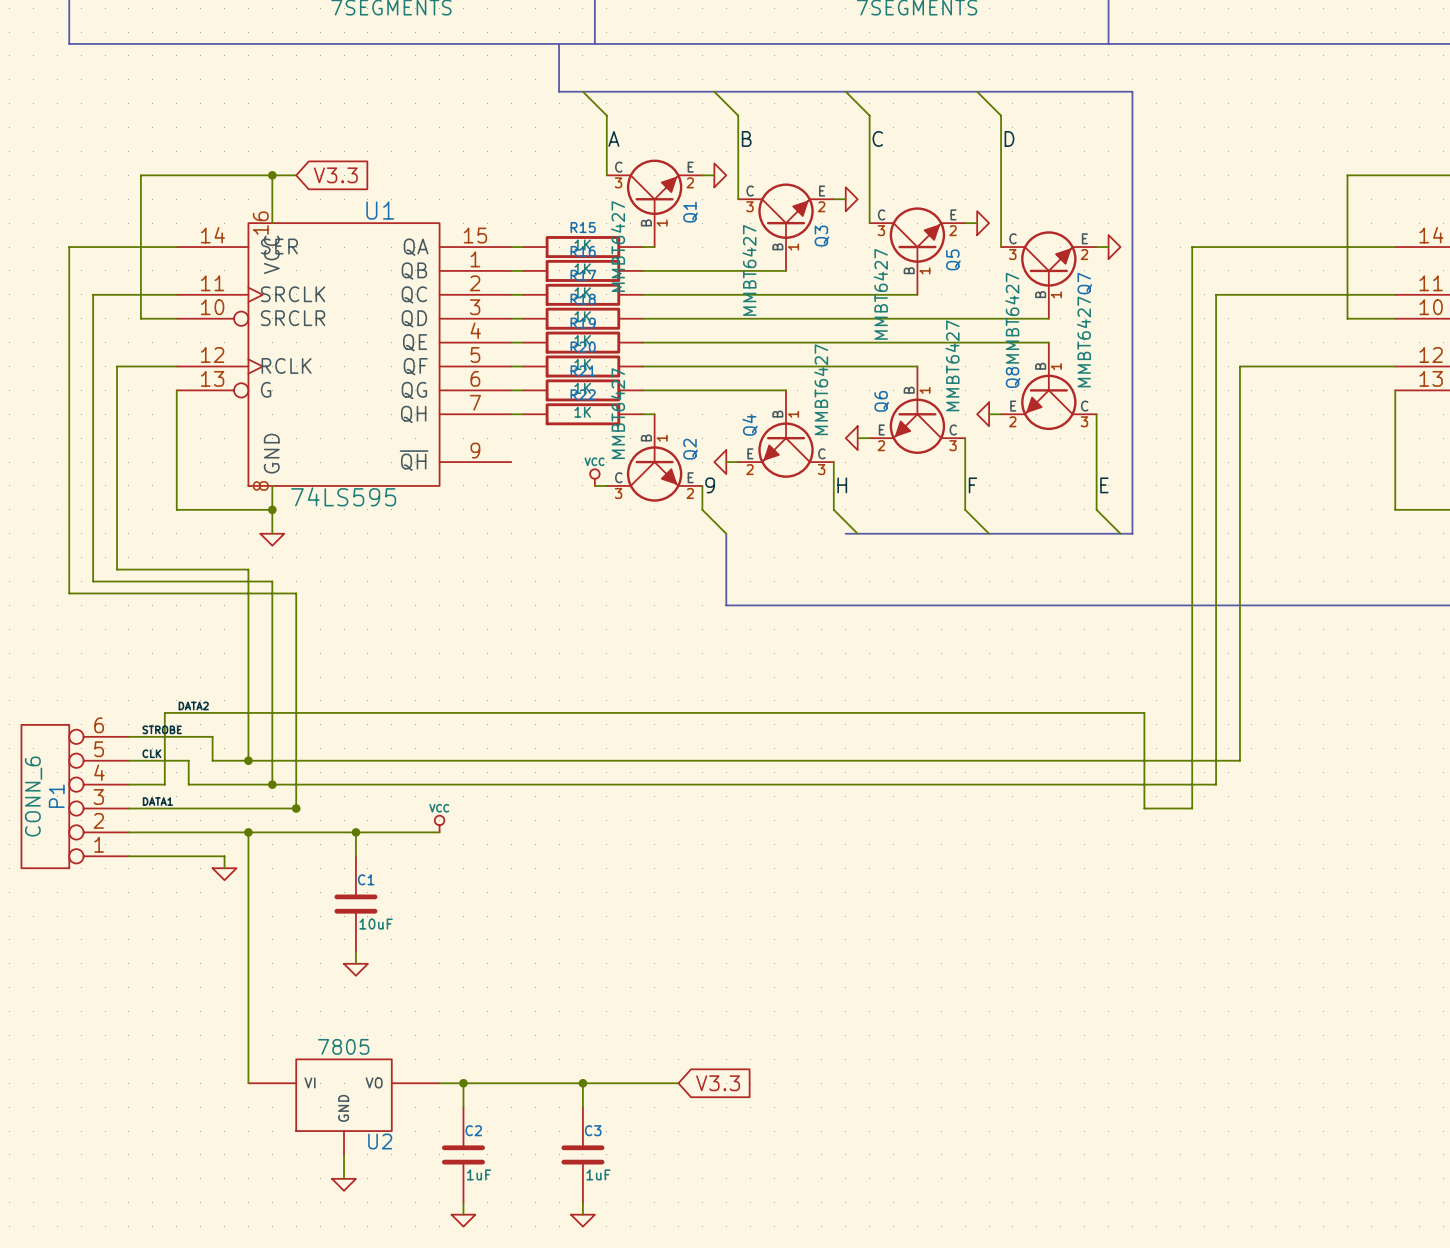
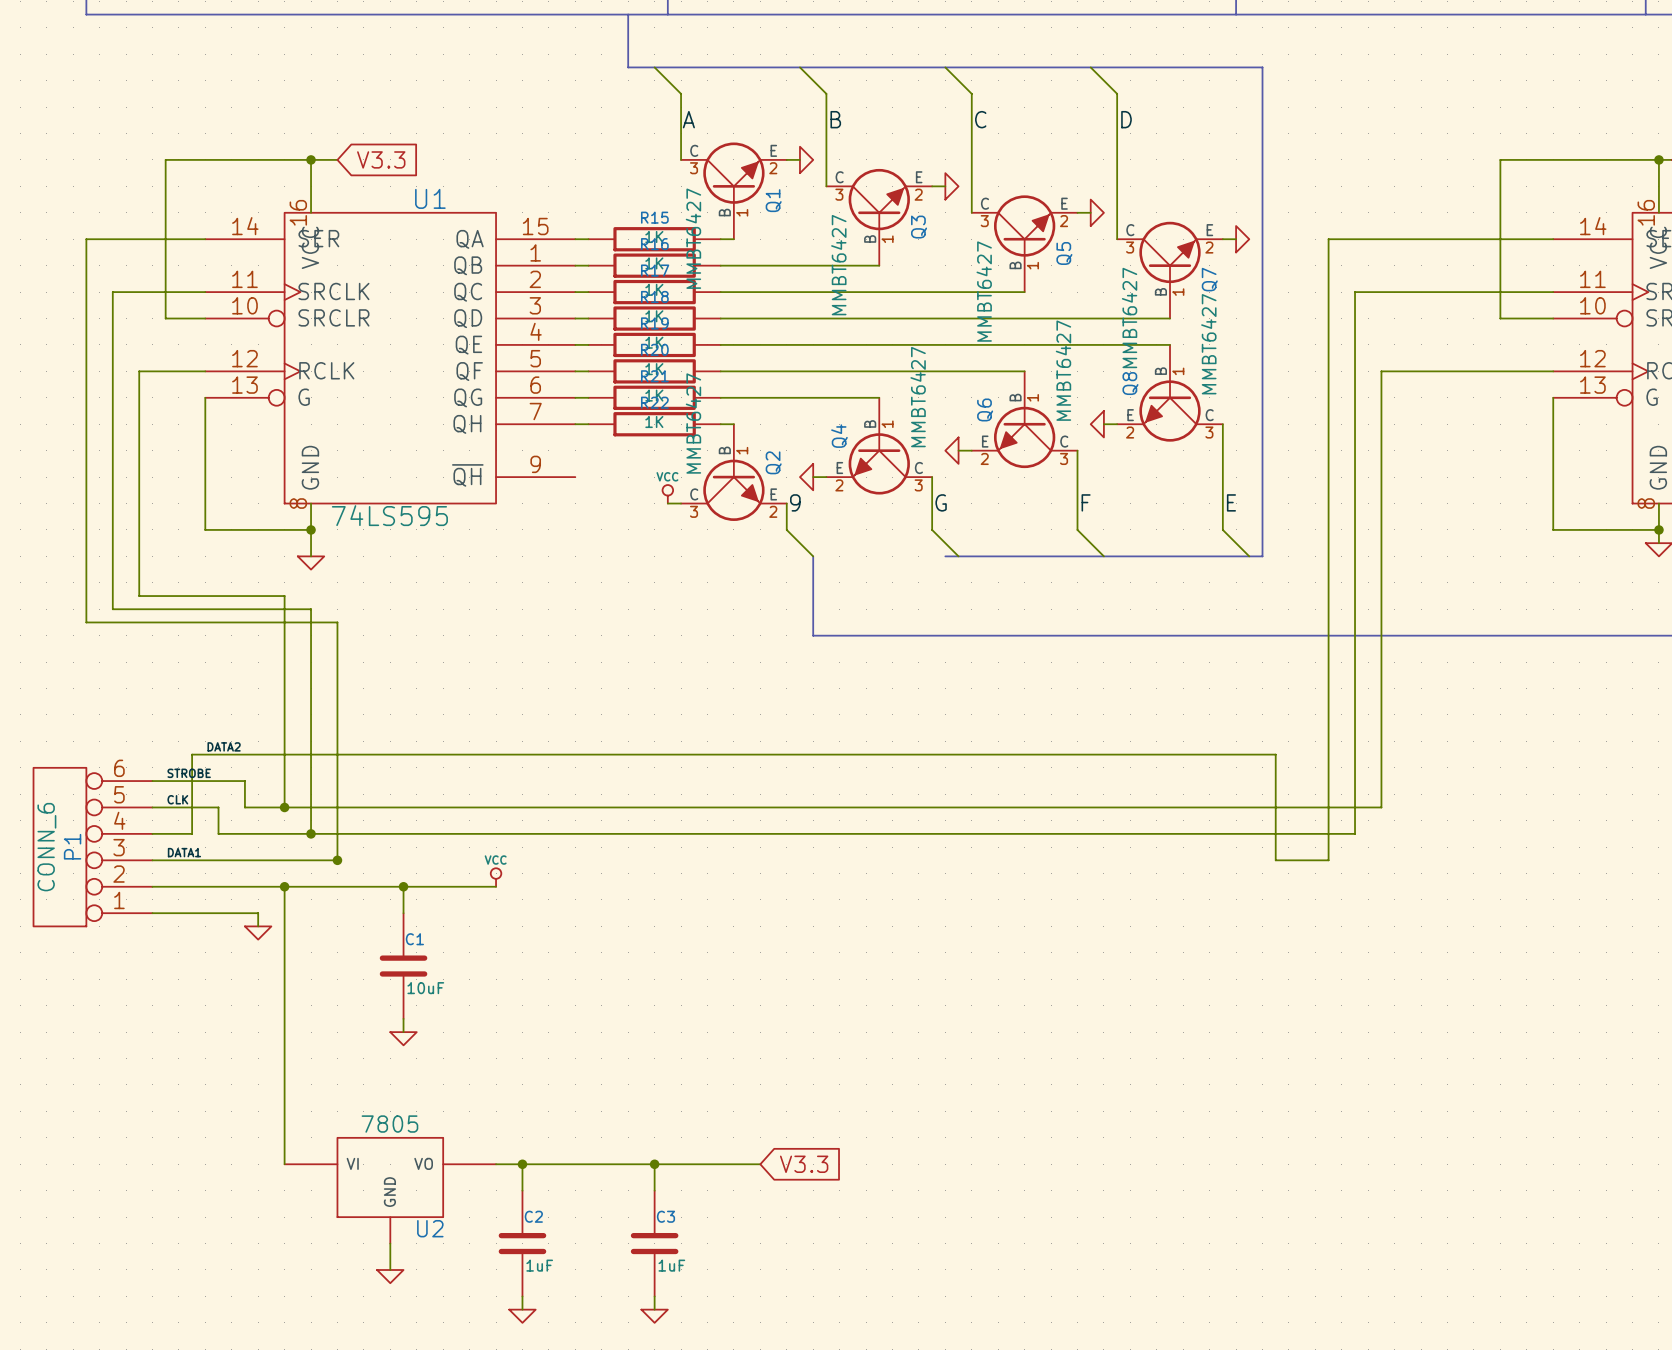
label: H (842, 485) -> G (941, 502)

